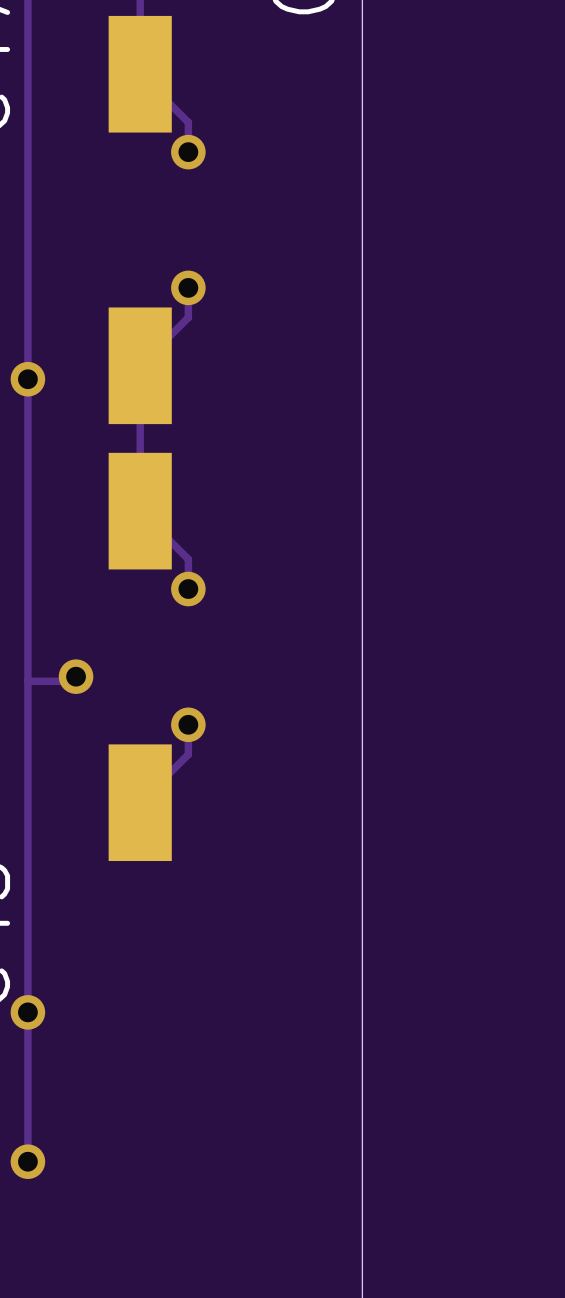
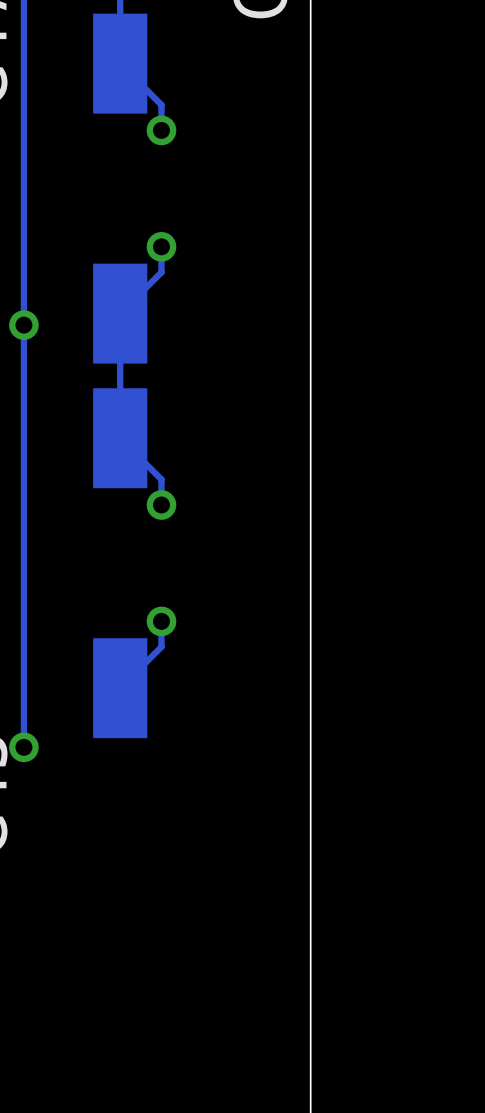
track: (76, 676) (71, 681) (27, 681) -> none
via: (76, 676) -> none
track: (27, 871) (27, 1161) -> none
via: none -> (23, 747)
via: (27, 1012) -> none
via: (27, 1161) -> none

